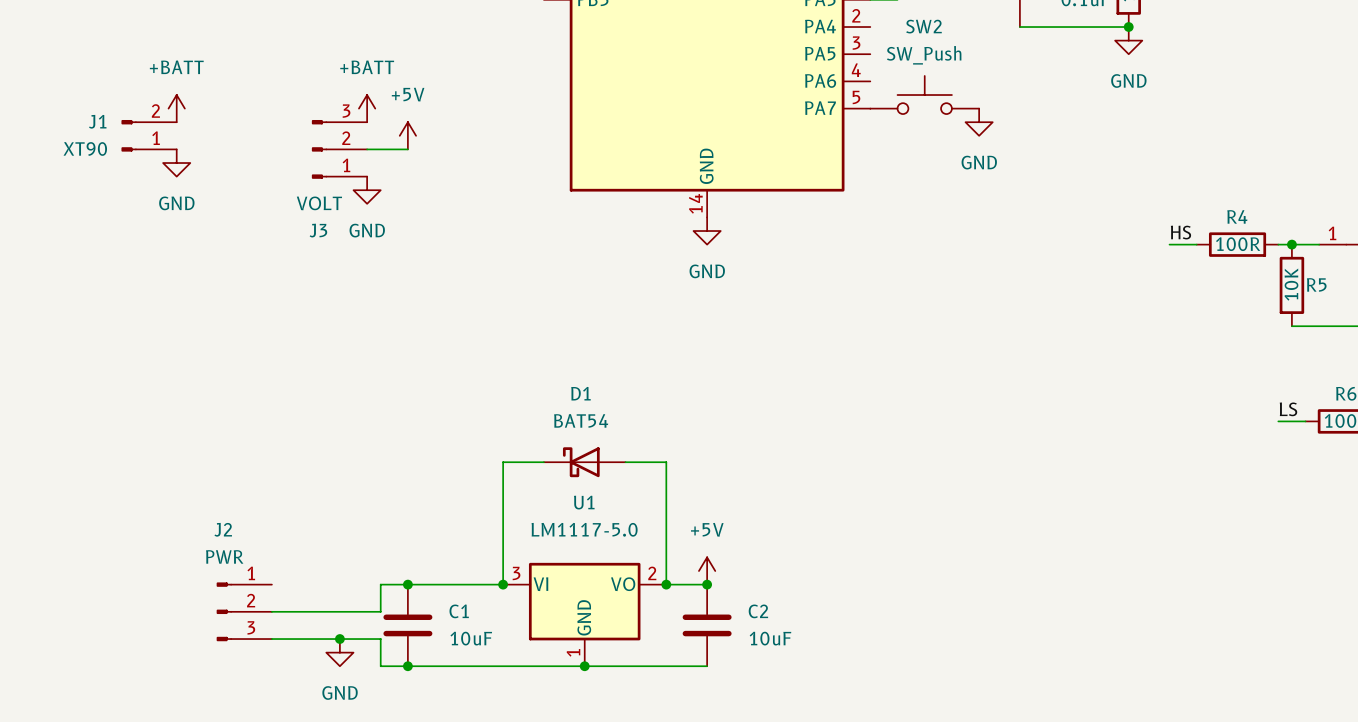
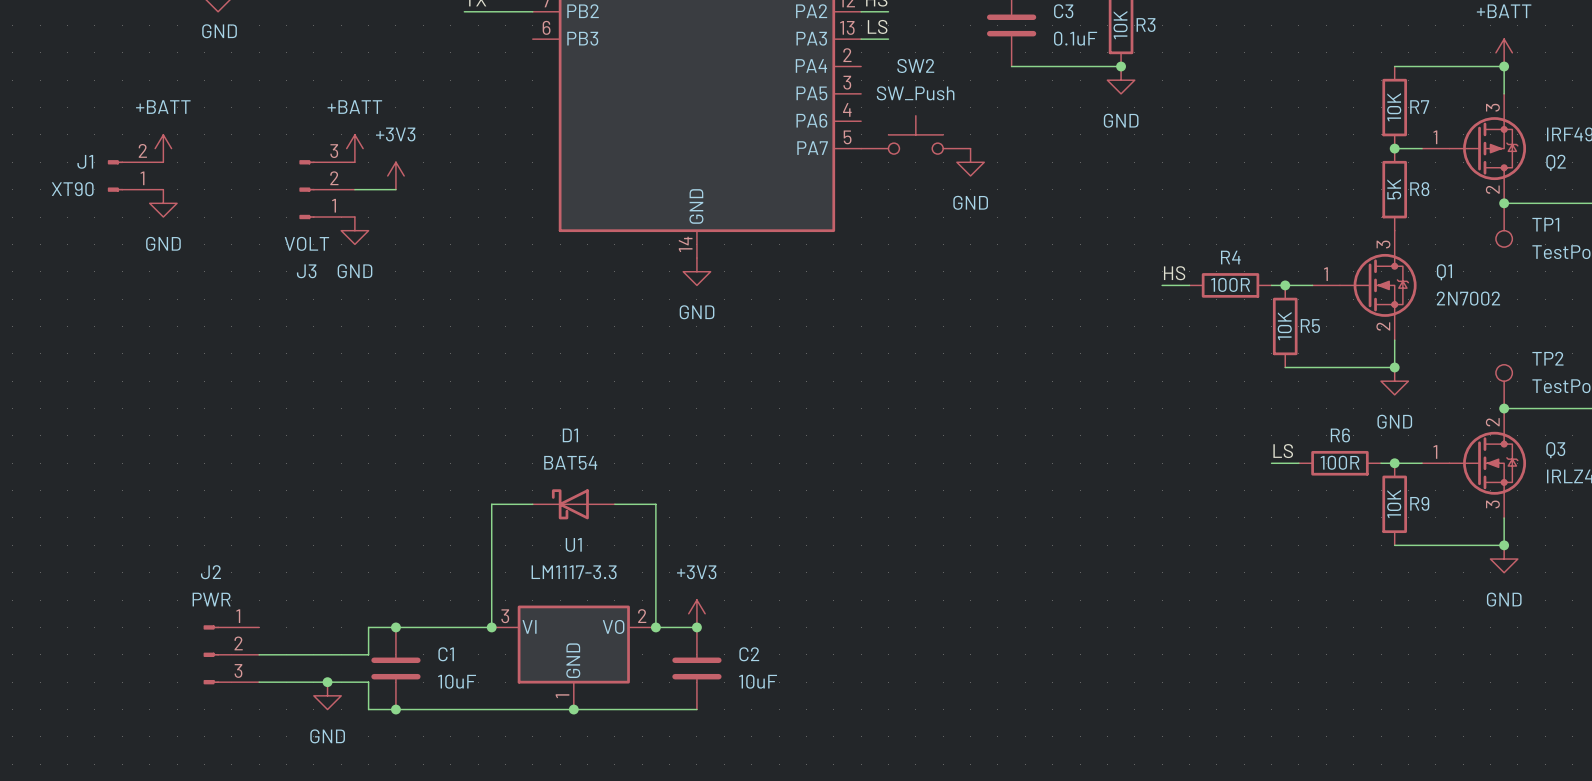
power symbol: +5V (407, 135) -> +3V3 (395, 175)
U1 value: LM1117-5.0 (584, 529) -> LM1117-3.3 (574, 572)
power symbol: +5V (707, 571) -> +3V3 (696, 613)

